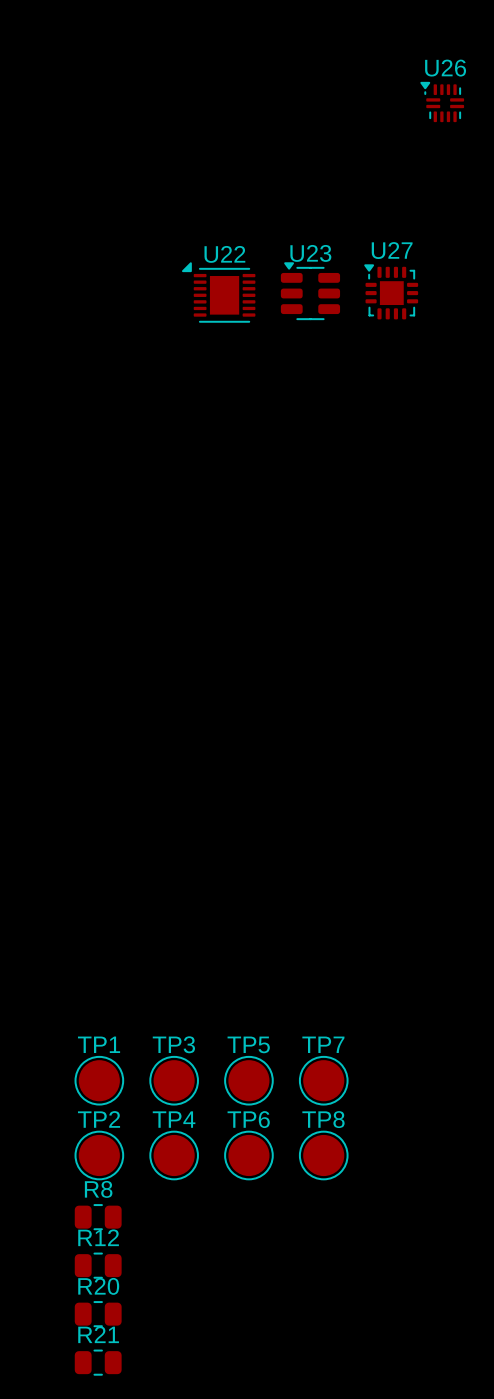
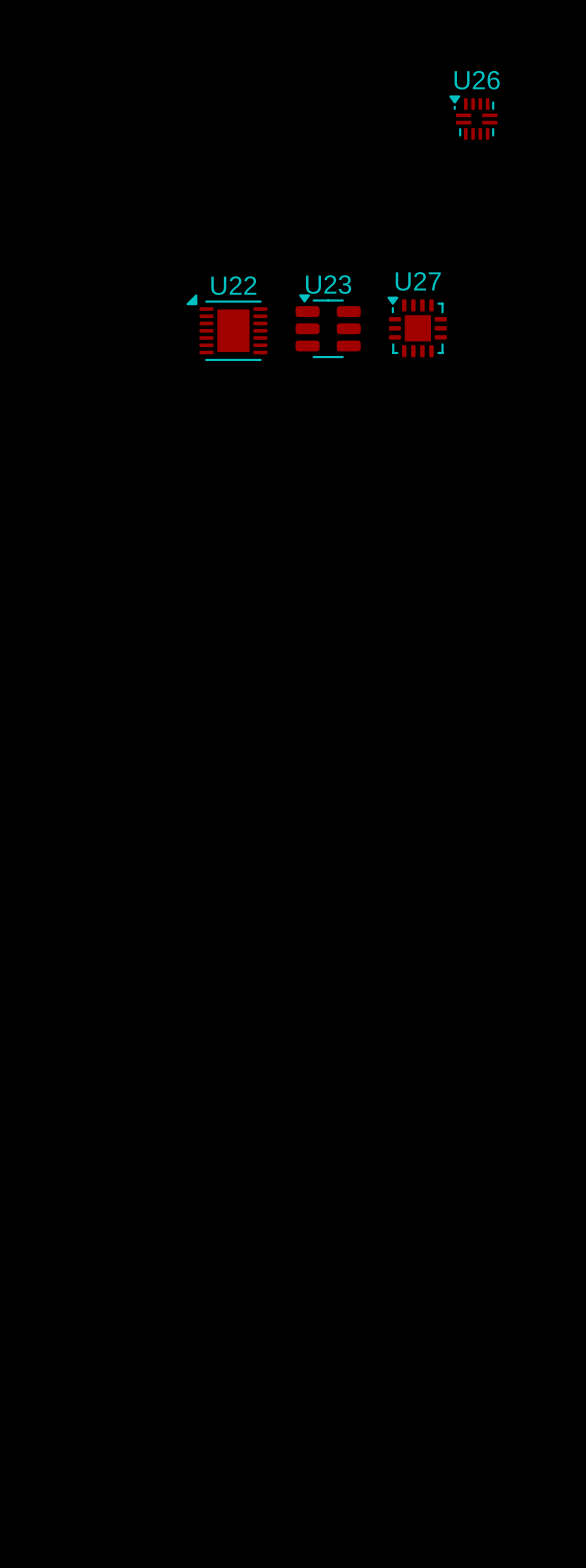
TP1: (99, 1080) -> none
TP3: (174, 1080) -> none
TP5: (248, 1080) -> none
TP7: (323, 1080) -> none
TP2: (99, 1155) -> none
TP4: (174, 1155) -> none
TP6: (248, 1155) -> none
TP8: (323, 1155) -> none
R8: (98, 1217) -> none
R12: (98, 1265) -> none
R20: (98, 1314) -> none
R21: (98, 1362) -> none

